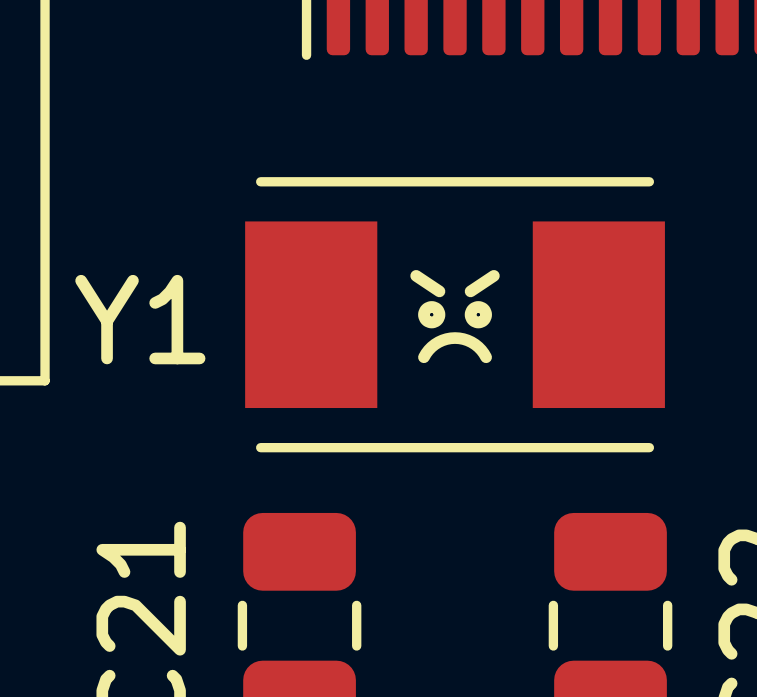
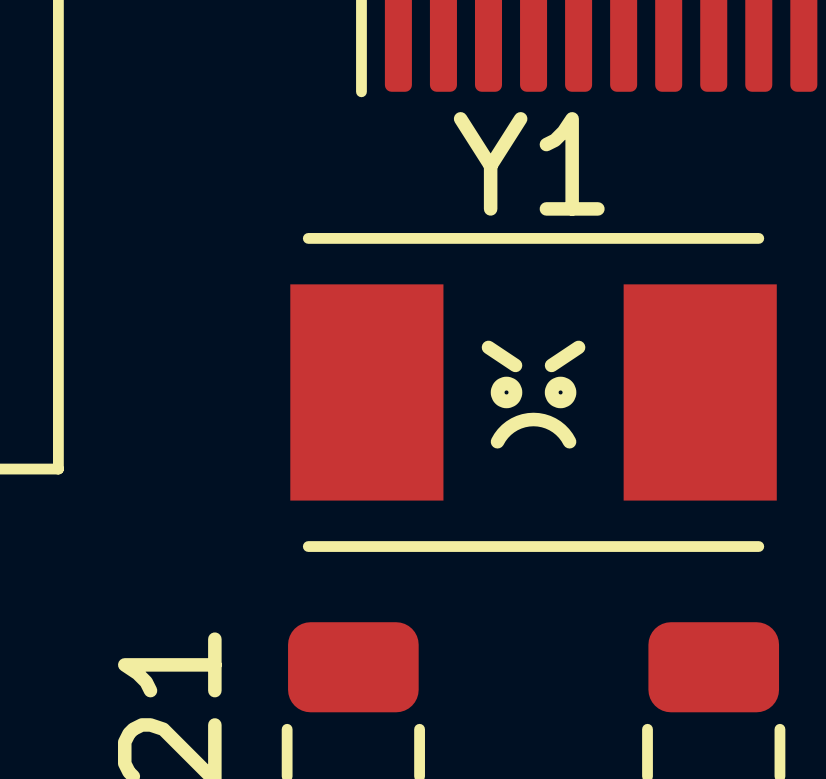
Y1 name position: Y1 (140, 319) -> Y1 (529, 163)

